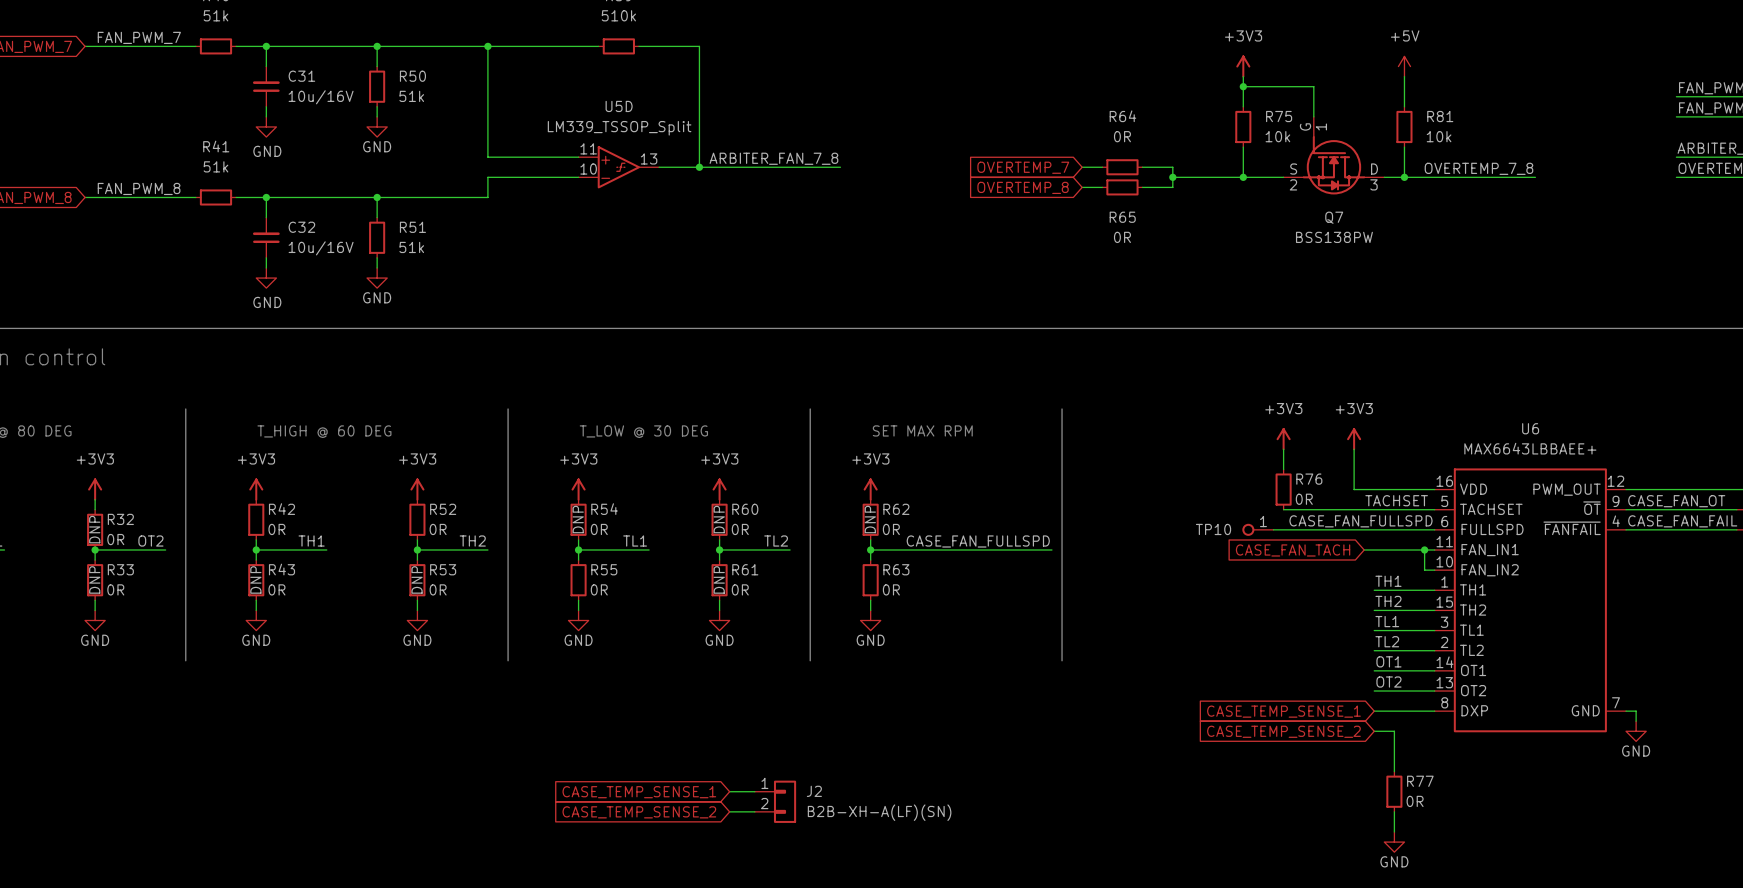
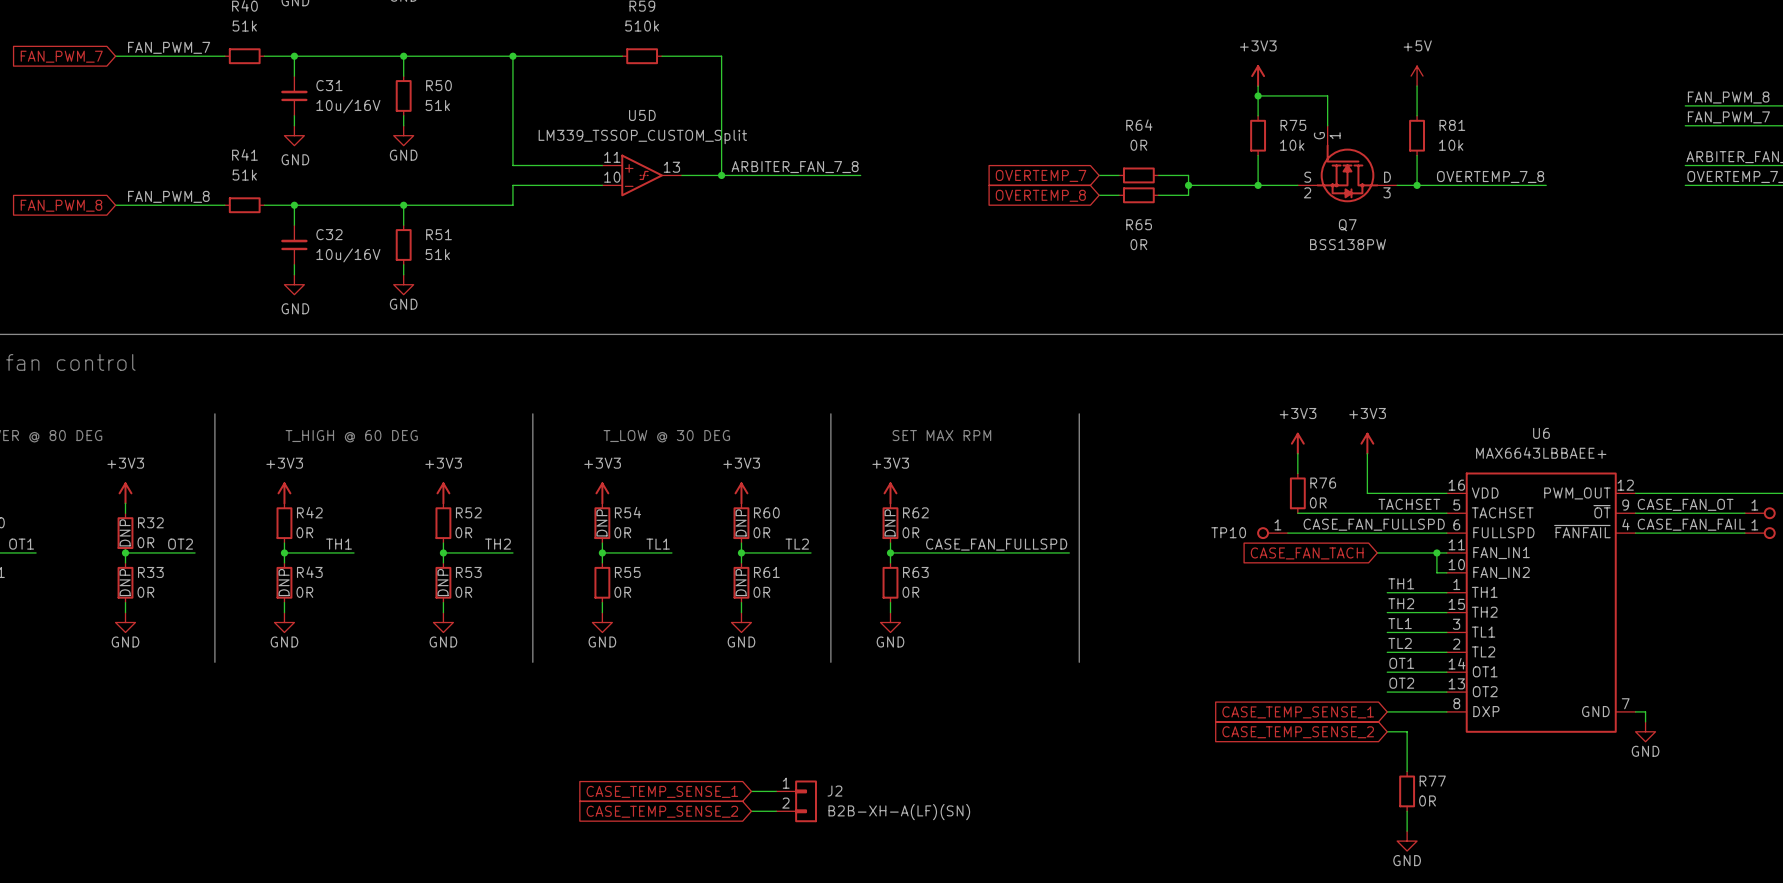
U5D value: LM339_TSSOP_Split (619, 128) -> LM339_TSSOP_CUSTOM_Split (642, 136)

